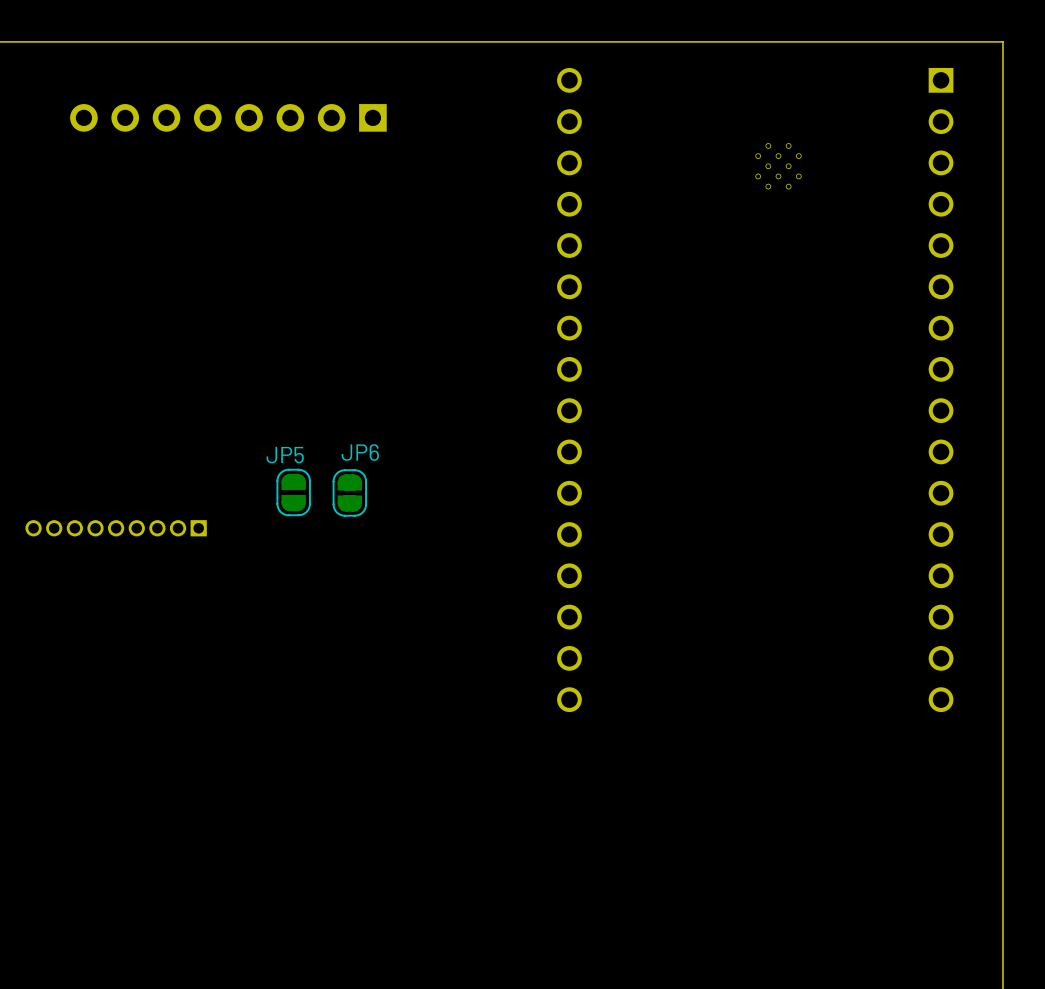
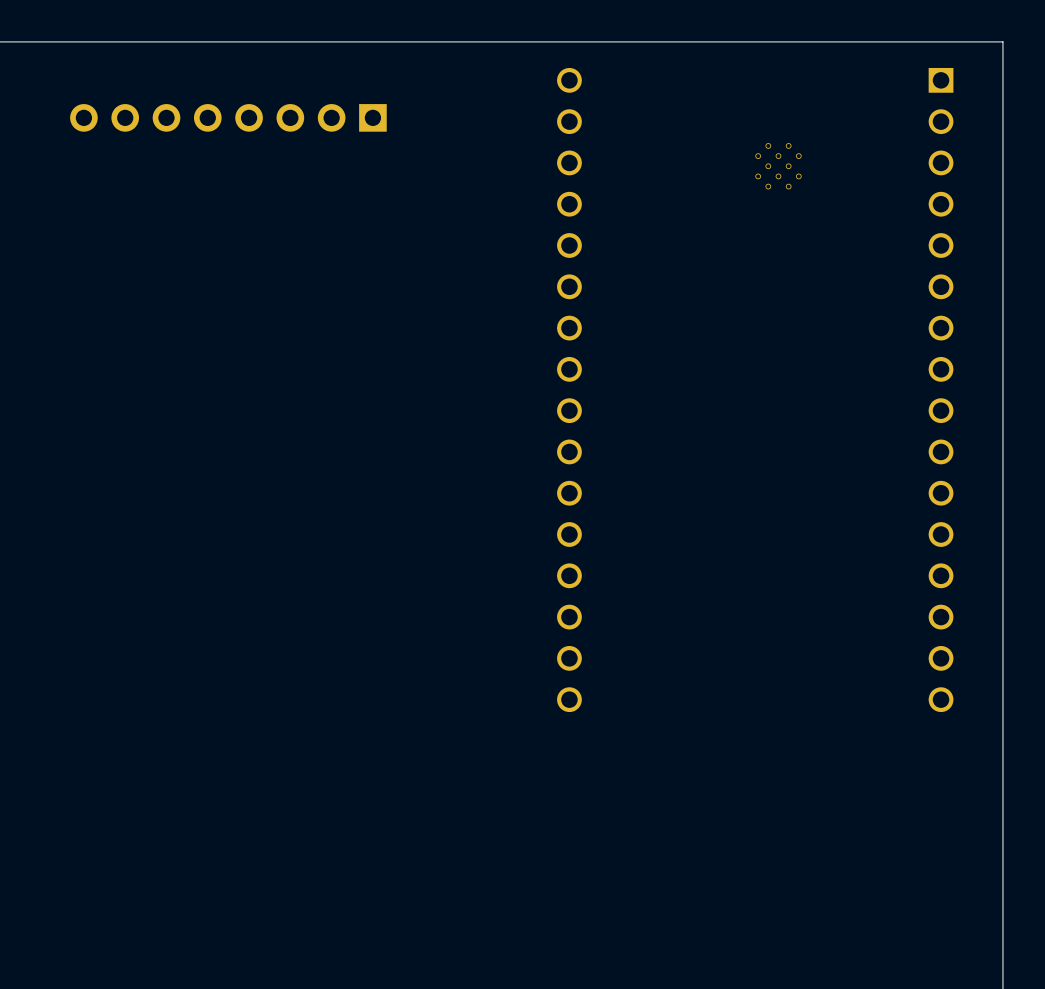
JP5: (293, 492) -> none
JP6: (349, 492) -> none
part: (116, 528) -> none

